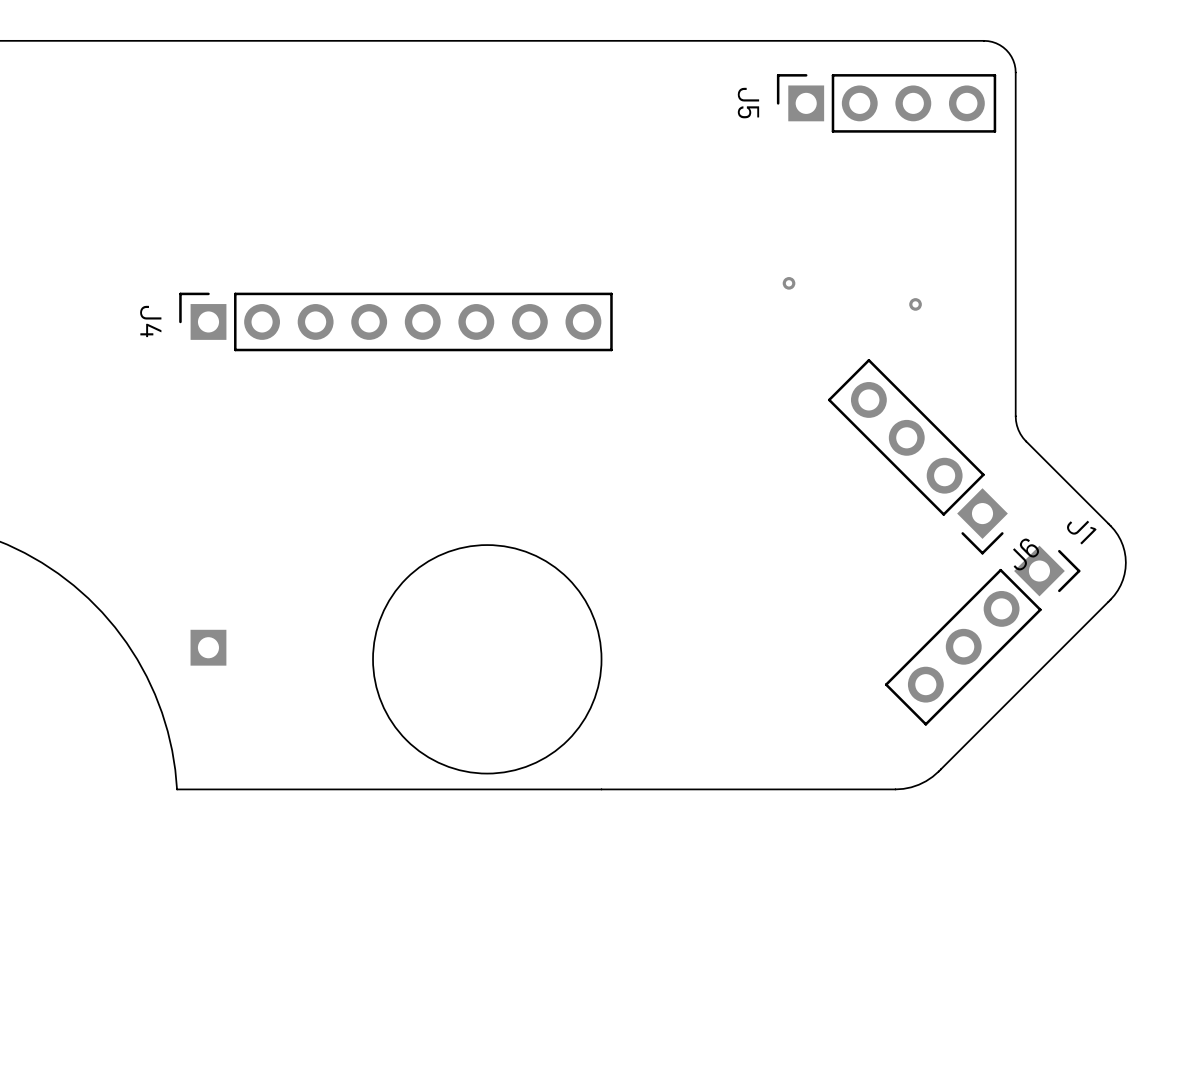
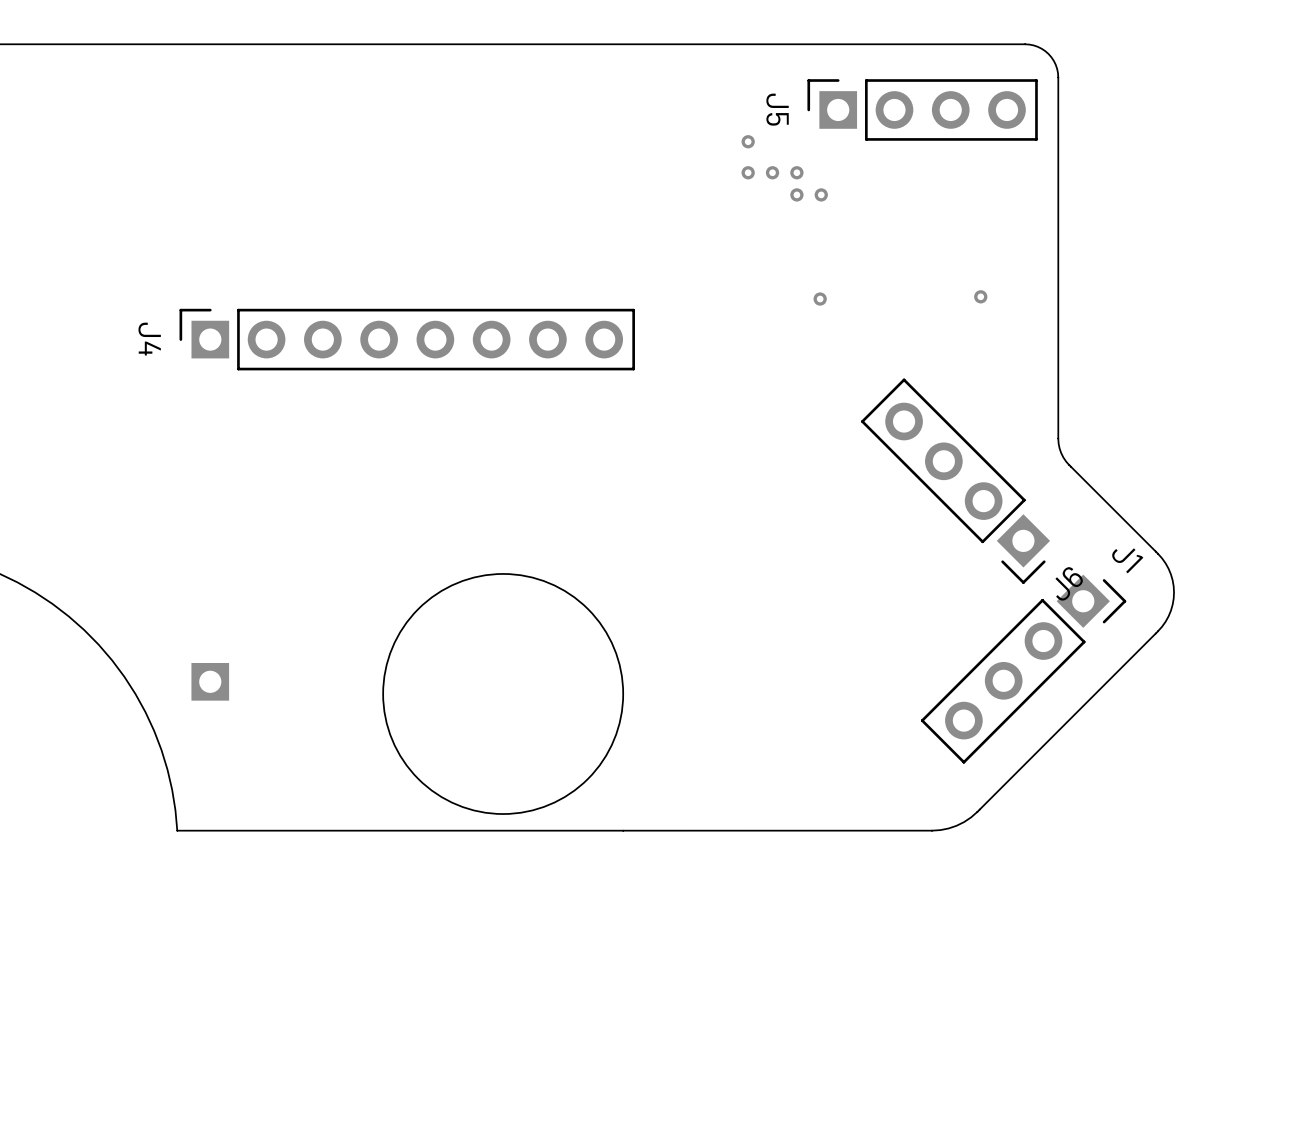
via: none -> (748, 141)
via: none -> (748, 172)
via: none -> (772, 172)
via: none -> (796, 172)
via: none -> (796, 194)
via: none -> (821, 194)
via position: (915, 304) -> (980, 296)

